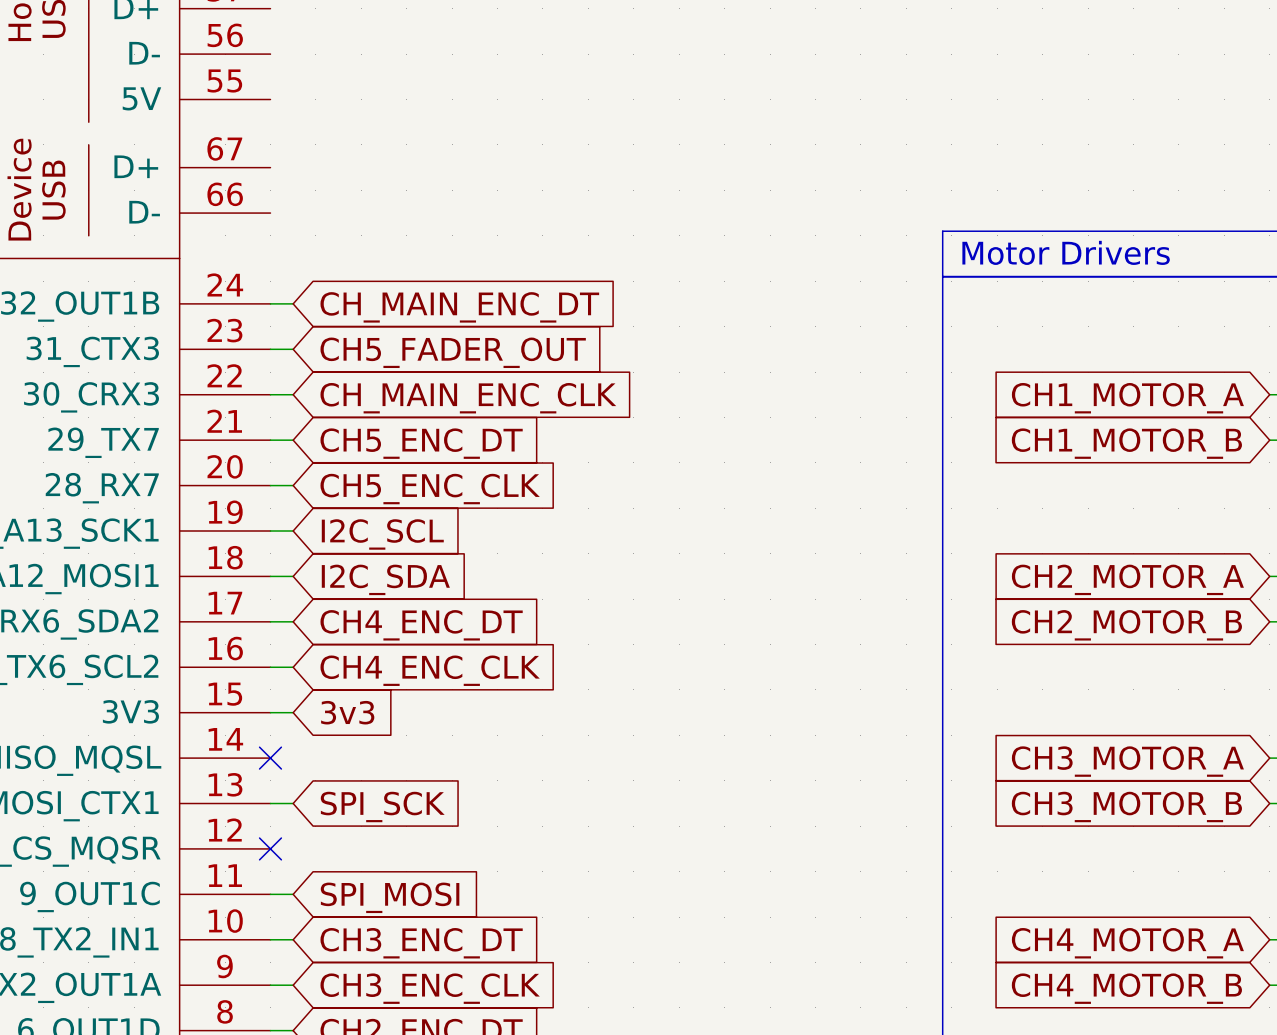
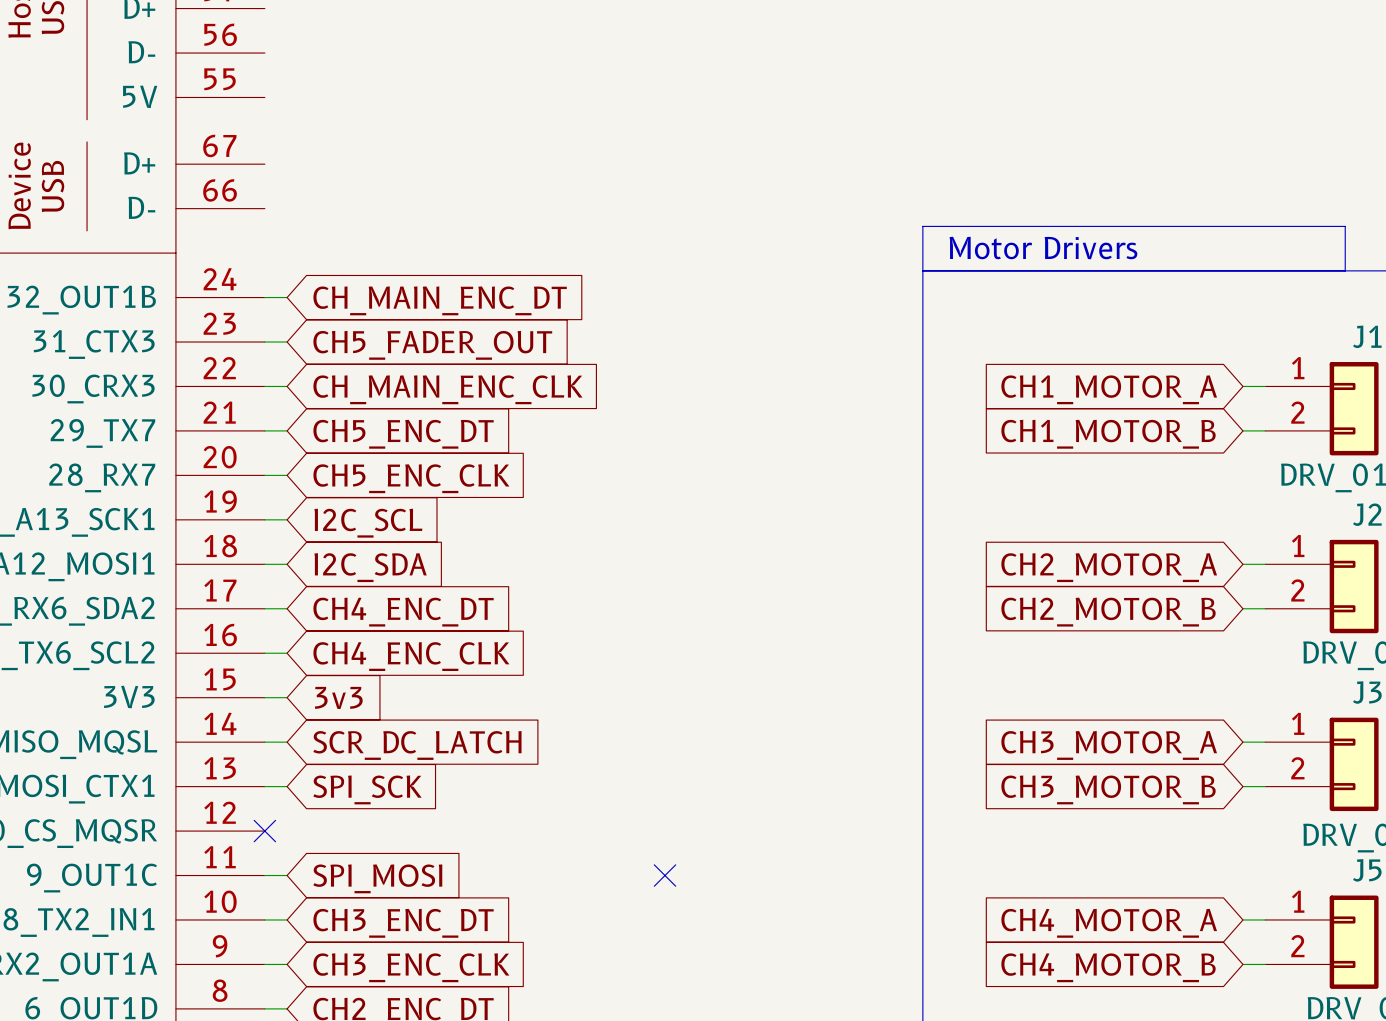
wire: none -> (264, 742) (287, 742)
no-connect mark: (270, 758) -> none
global label: none -> SCR_DC_LATCH (417, 745)
no-connect mark: none -> (665, 875)

